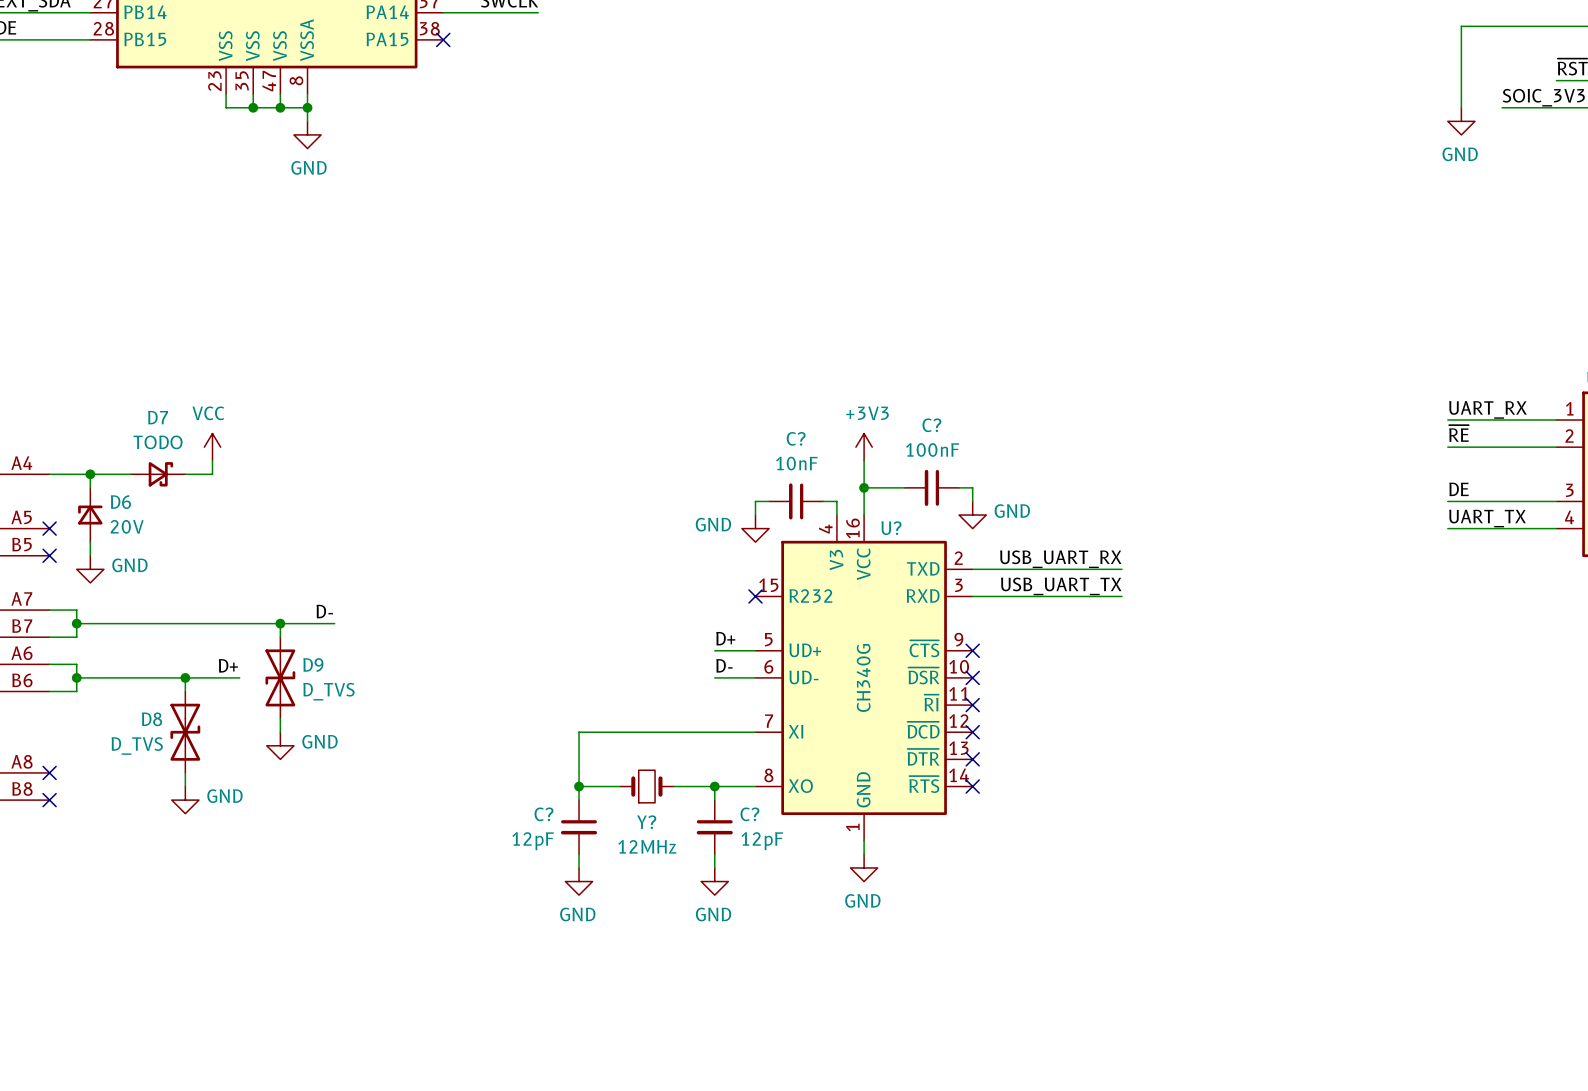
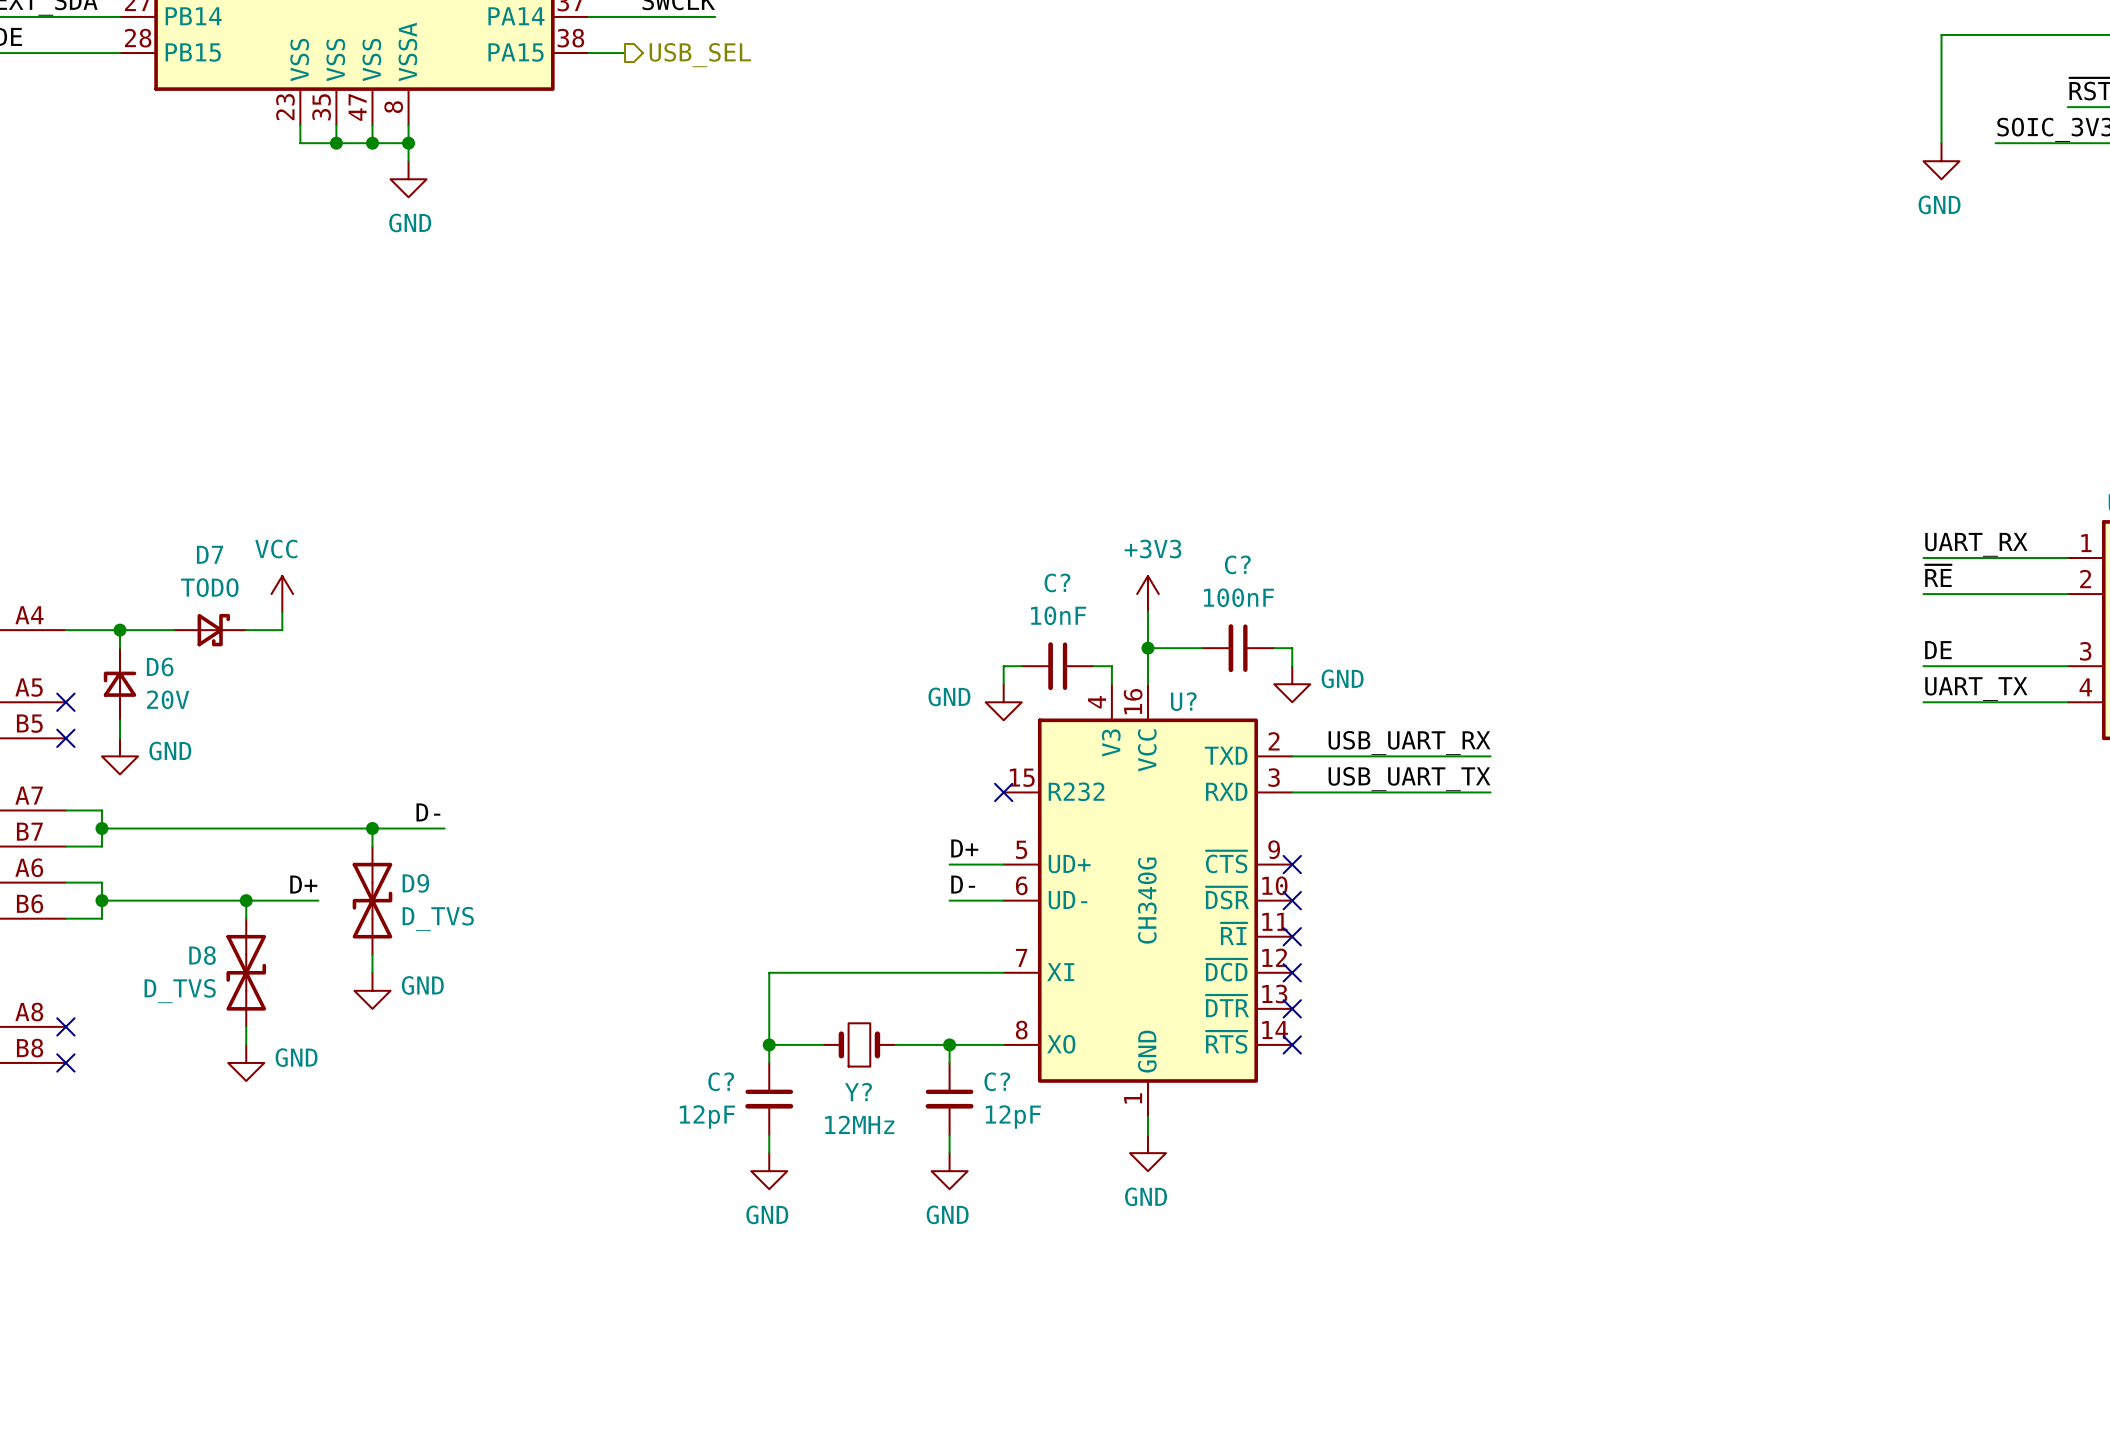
wire: none -> (588, 53) (624, 53)
no-connect mark: (443, 39) -> none
hierarchical label: none -> USB_SEL (700, 55)

